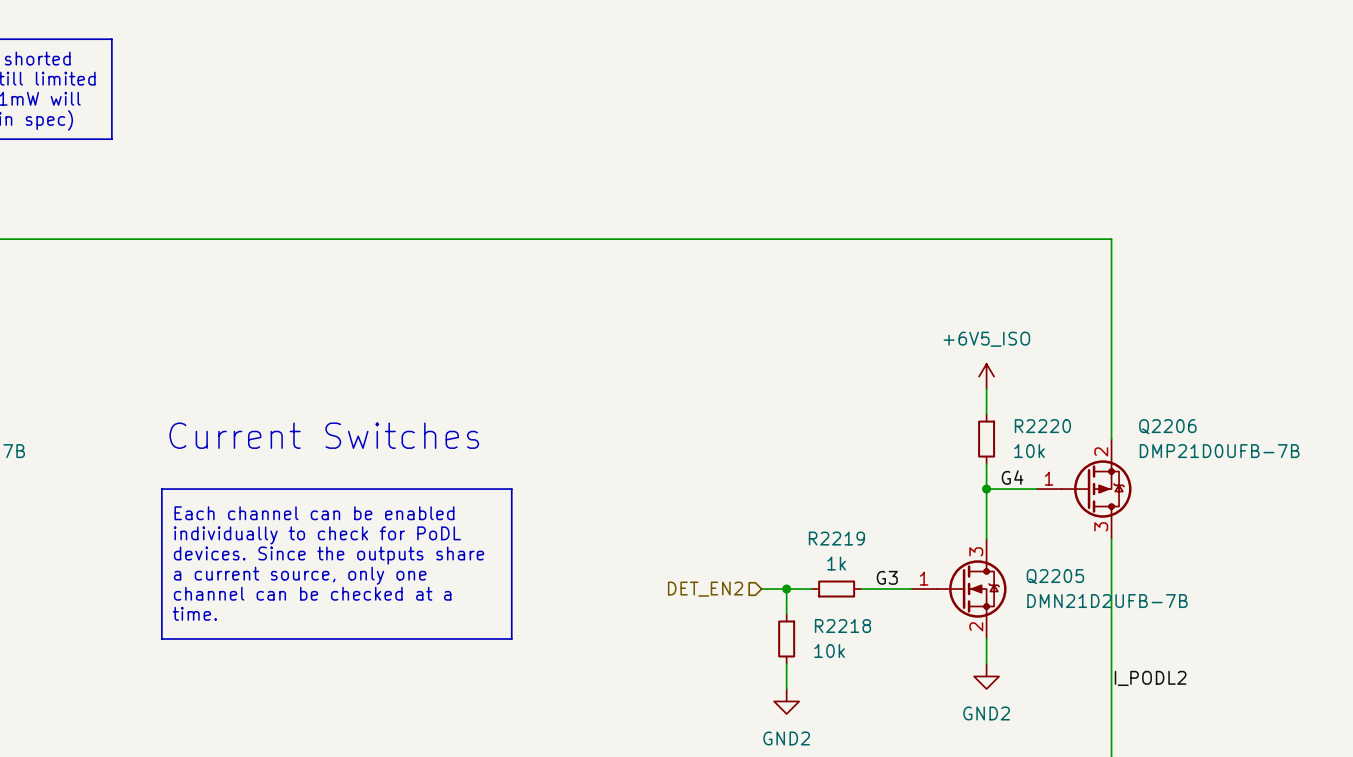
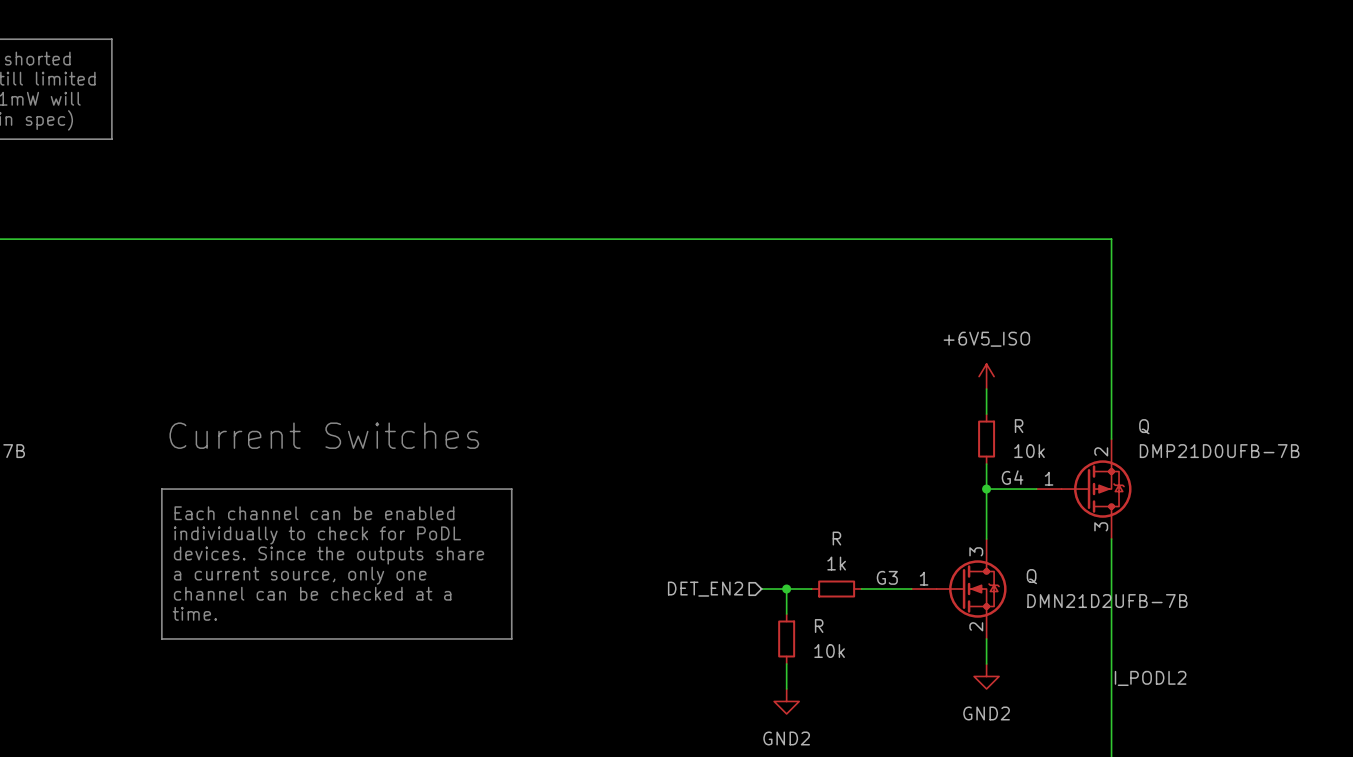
R2220 name: R2220 (1042, 426) -> R (1019, 426)
Q2206 name: Q2206 (1167, 426) -> Q (1144, 426)
R2219 name: R2219 (836, 538) -> R (836, 538)
Q2205 name: Q2205 (1055, 576) -> Q (1031, 576)
R2218 name: R2218 (842, 626) -> R (819, 626)

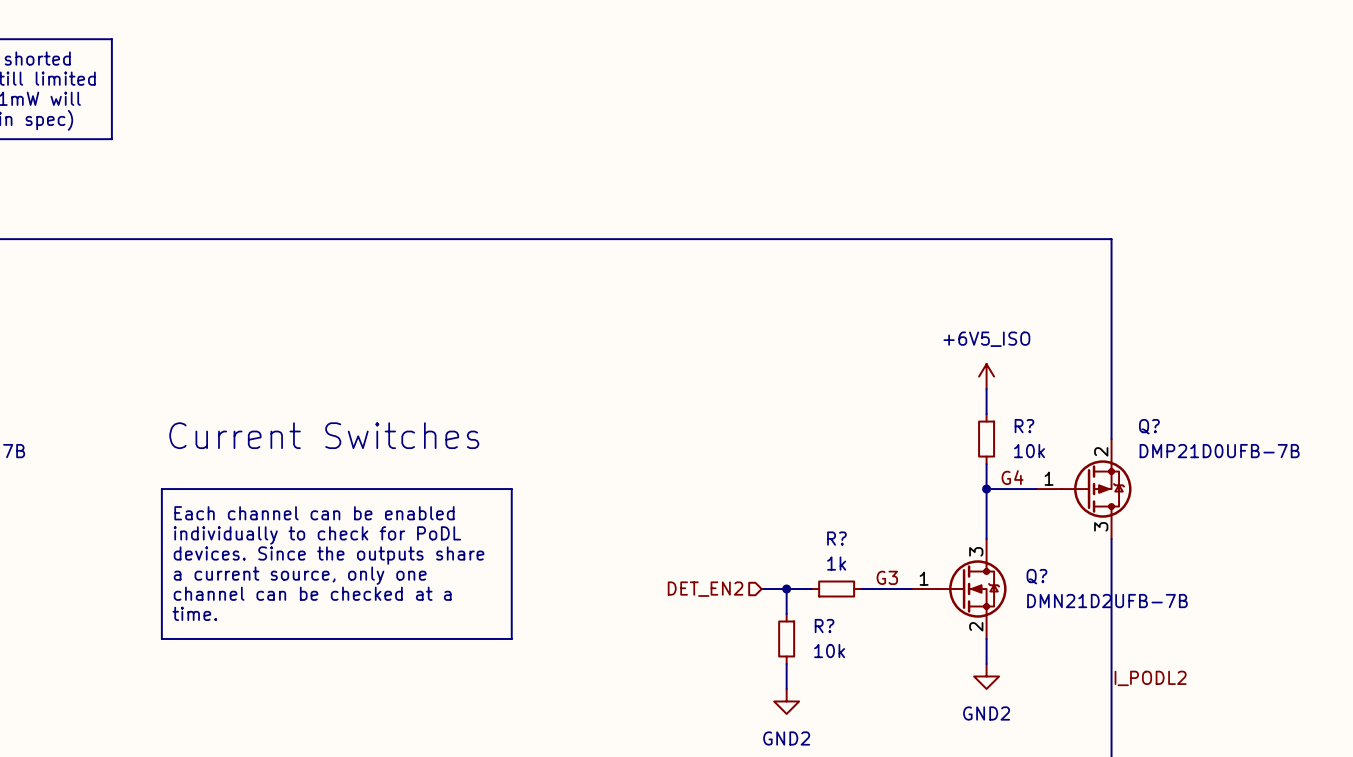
R name: R (1019, 426) -> R? (1024, 426)
Q name: Q (1144, 426) -> Q? (1149, 426)
R name: R (836, 538) -> R? (836, 538)
Q name: Q (1031, 576) -> Q? (1036, 576)
R name: R (819, 626) -> R? (824, 626)

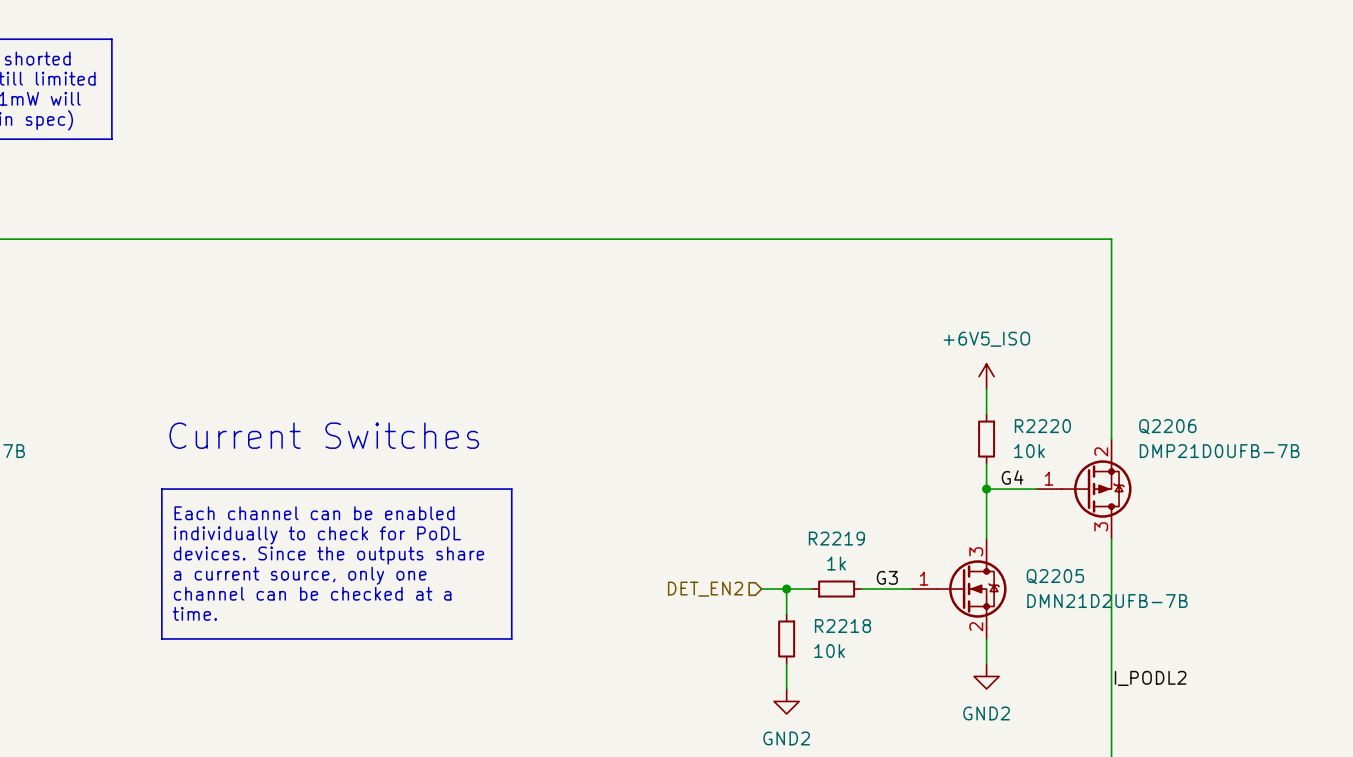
R? name: R? (1024, 426) -> R2220 (1042, 426)
Q? name: Q? (1149, 426) -> Q2206 (1167, 426)
R? name: R? (836, 538) -> R2219 (836, 538)
Q? name: Q? (1036, 576) -> Q2205 (1055, 576)
R? name: R? (824, 626) -> R2218 (842, 626)

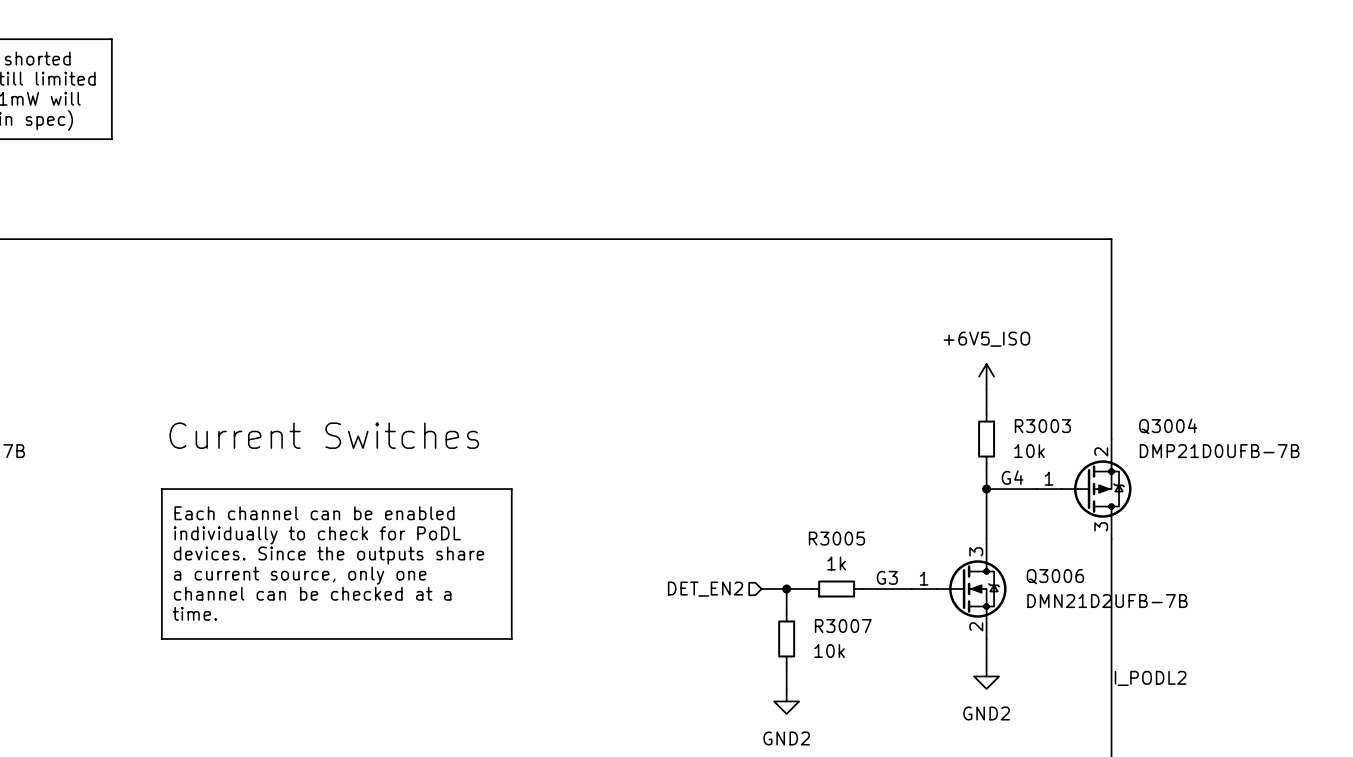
R2220 name: R2220 (1042, 426) -> R3003 (1042, 426)
Q2206 name: Q2206 (1167, 426) -> Q3004 (1168, 426)
R2219 name: R2219 (836, 538) -> R3005 (836, 538)
Q2205 name: Q2205 (1055, 576) -> Q3006 (1055, 576)
R2218 name: R2218 (842, 626) -> R3007 (843, 626)

